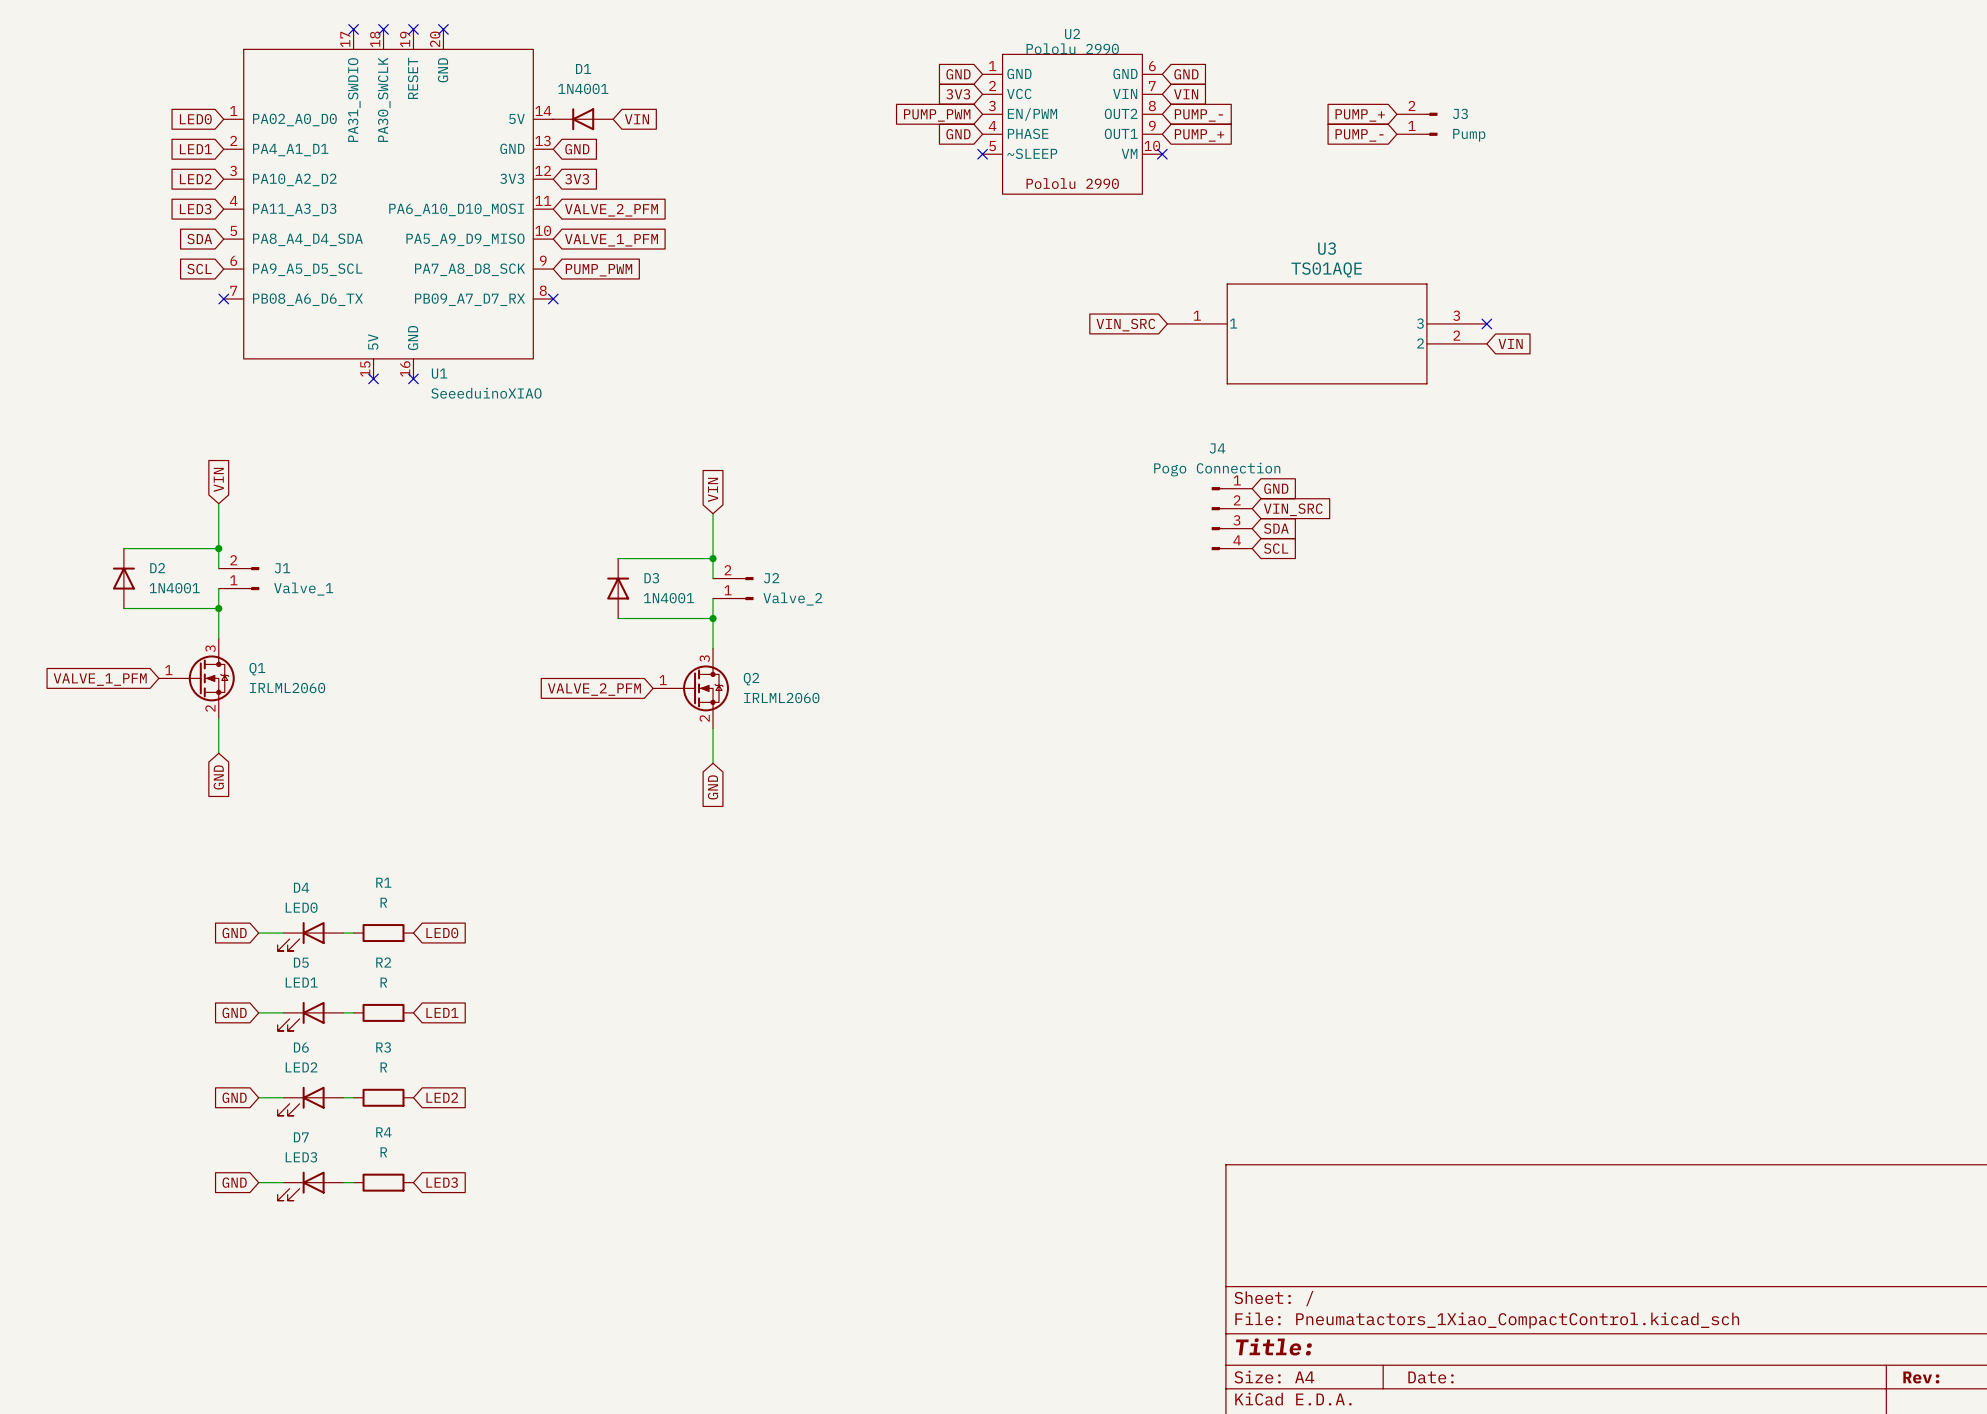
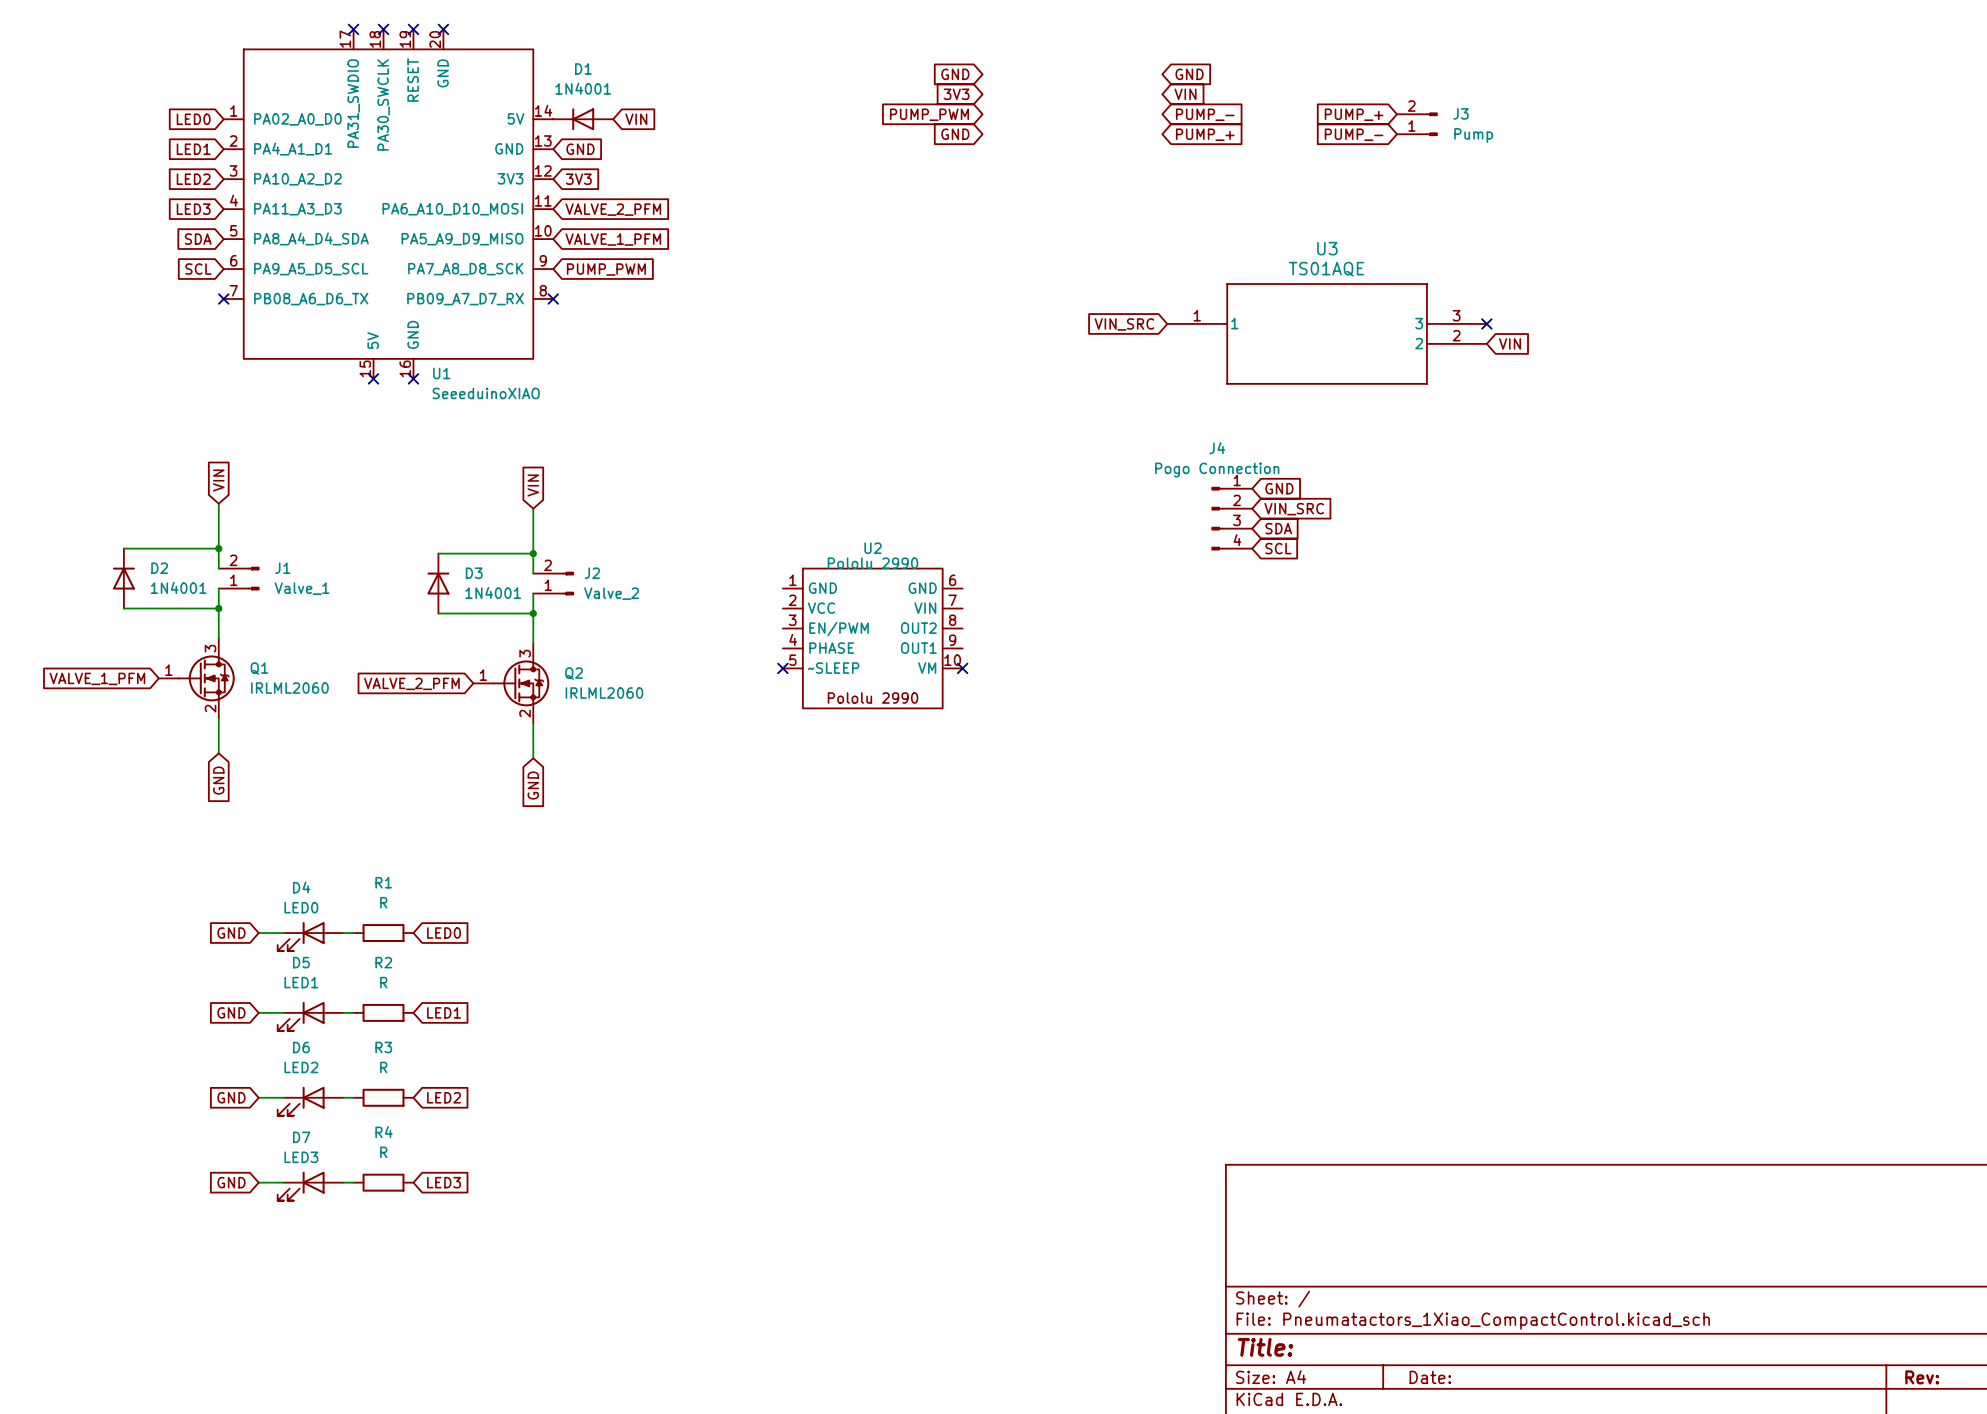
U2 position: (1072, 124) -> (872, 638)
no-connect mark: (982, 154) -> none
no-connect mark: (1162, 154) -> none
global label position: VIN (713, 489) -> VIN (533, 485)
wire: (713, 513) (713, 578) -> (533, 508) (533, 573)
junction: none -> (533, 553)
wire: (618, 558) (713, 558) -> (438, 553) (533, 553)
junction: (713, 558) -> none
D3 position: (618, 588) -> (438, 583)
J2 position: (733, 588) -> (553, 583)
wire: (713, 598) (713, 648) -> (533, 593) (533, 643)
junction: none -> (533, 613)
wire: (618, 618) (713, 618) -> (438, 613) (533, 613)
junction: (713, 618) -> none
no-connect mark: none -> (782, 668)
no-connect mark: none -> (962, 668)
Q2 position: (691, 688) -> (511, 683)
global label position: VALVE_2_PFM (594, 689) -> VALVE_2_PFM (411, 683)
wire: (713, 728) (713, 763) -> (533, 723) (533, 758)
global label position: GND (713, 787) -> GND (533, 785)

